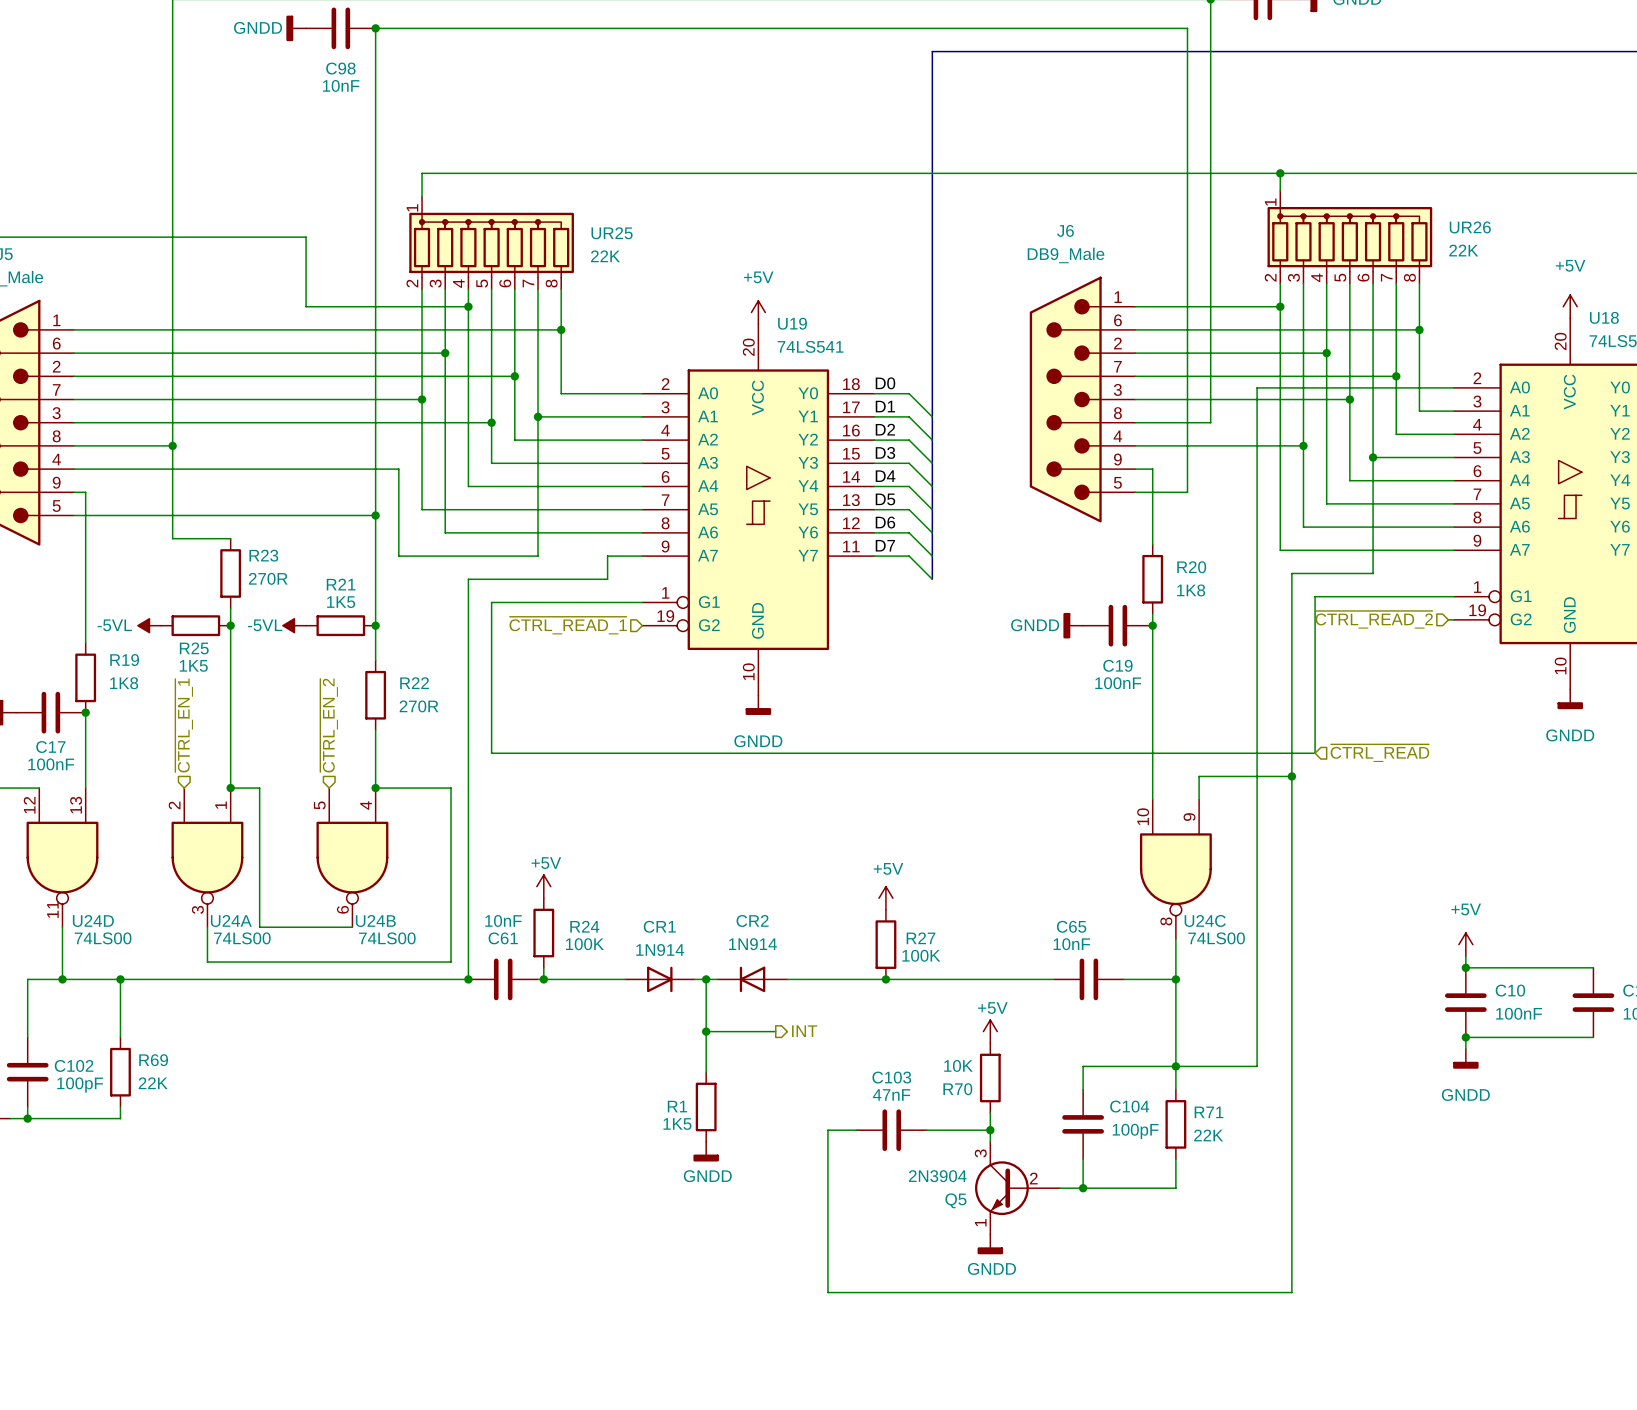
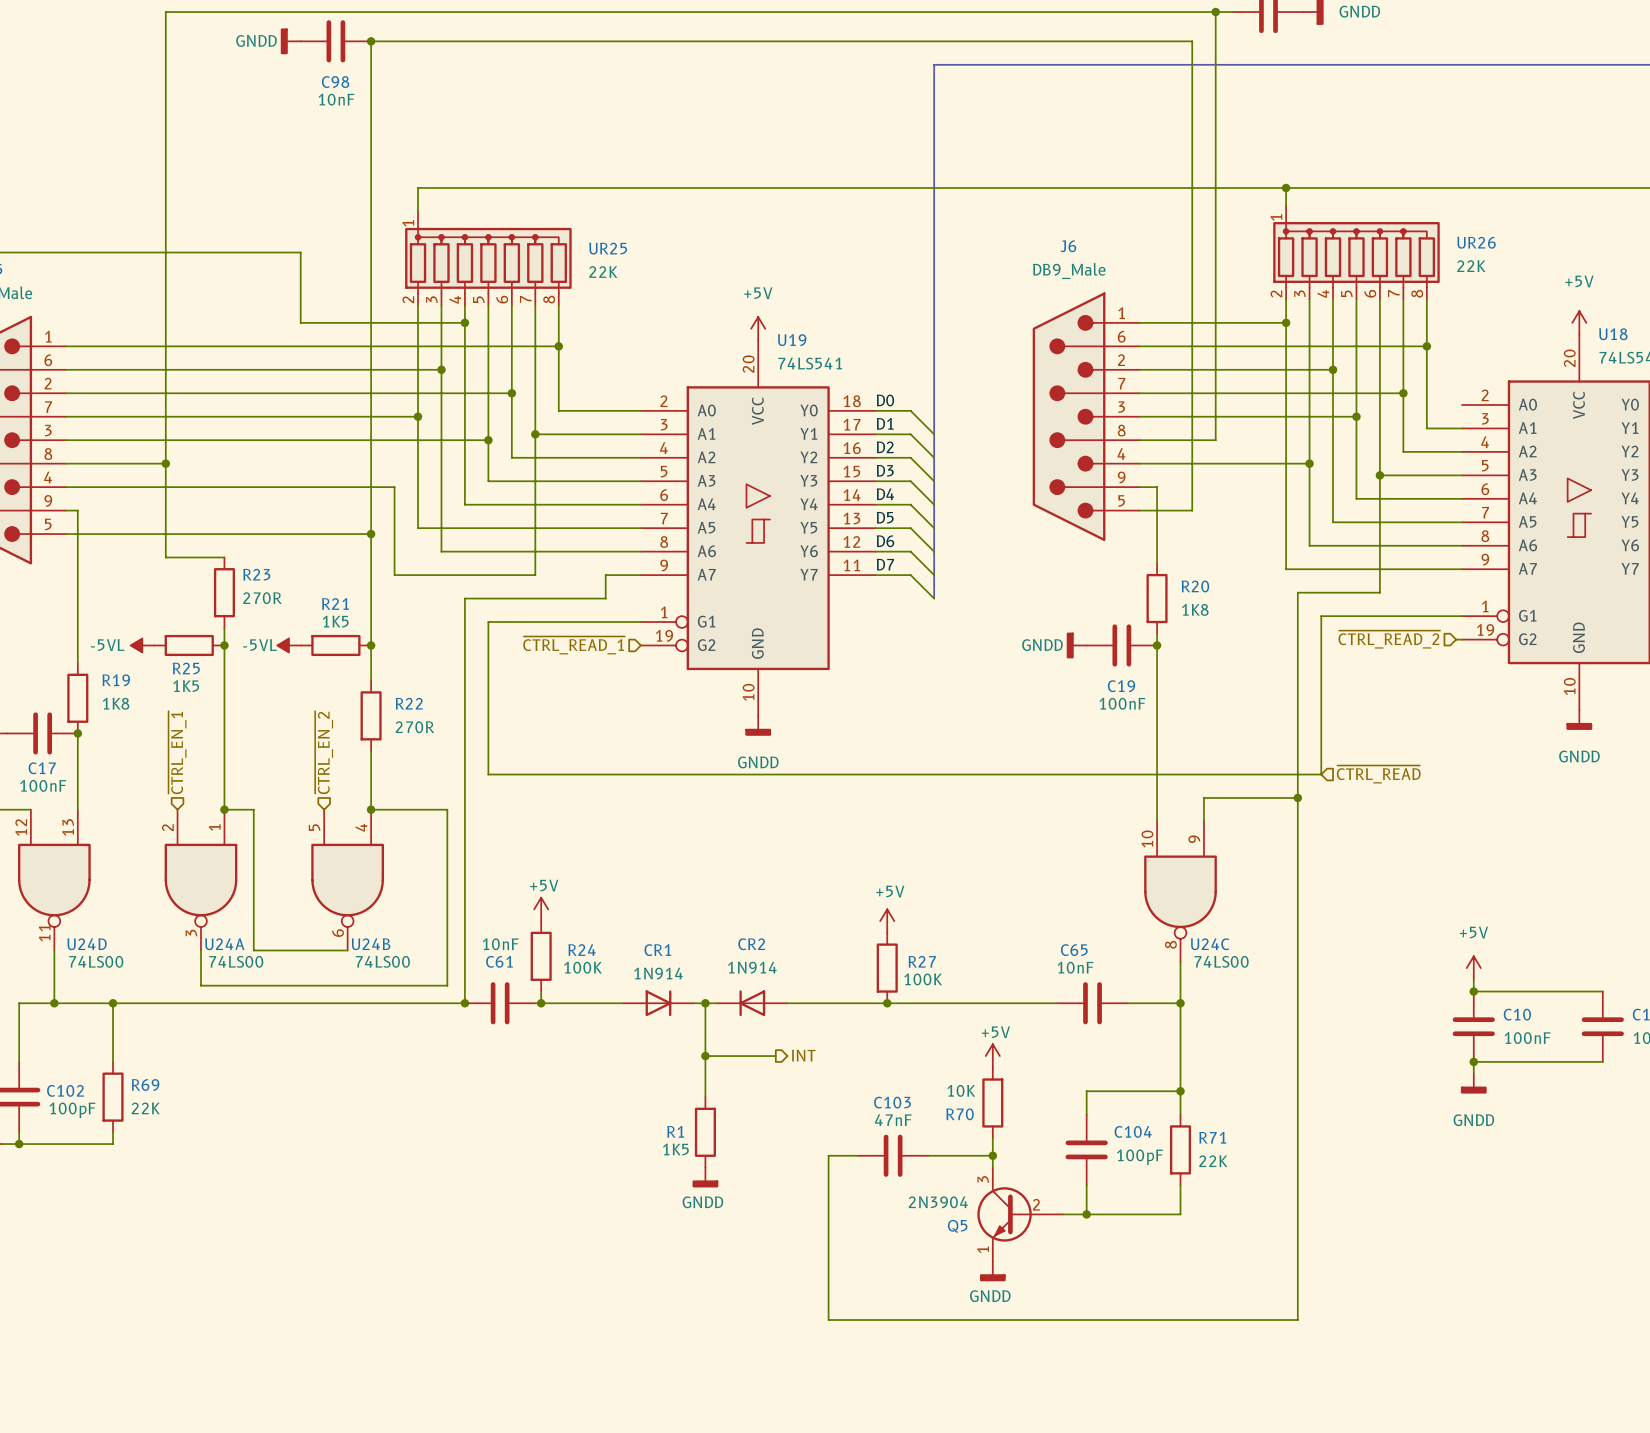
wire: (1454, 387) (1257, 387) (1257, 1066) (1175, 1066) -> none

